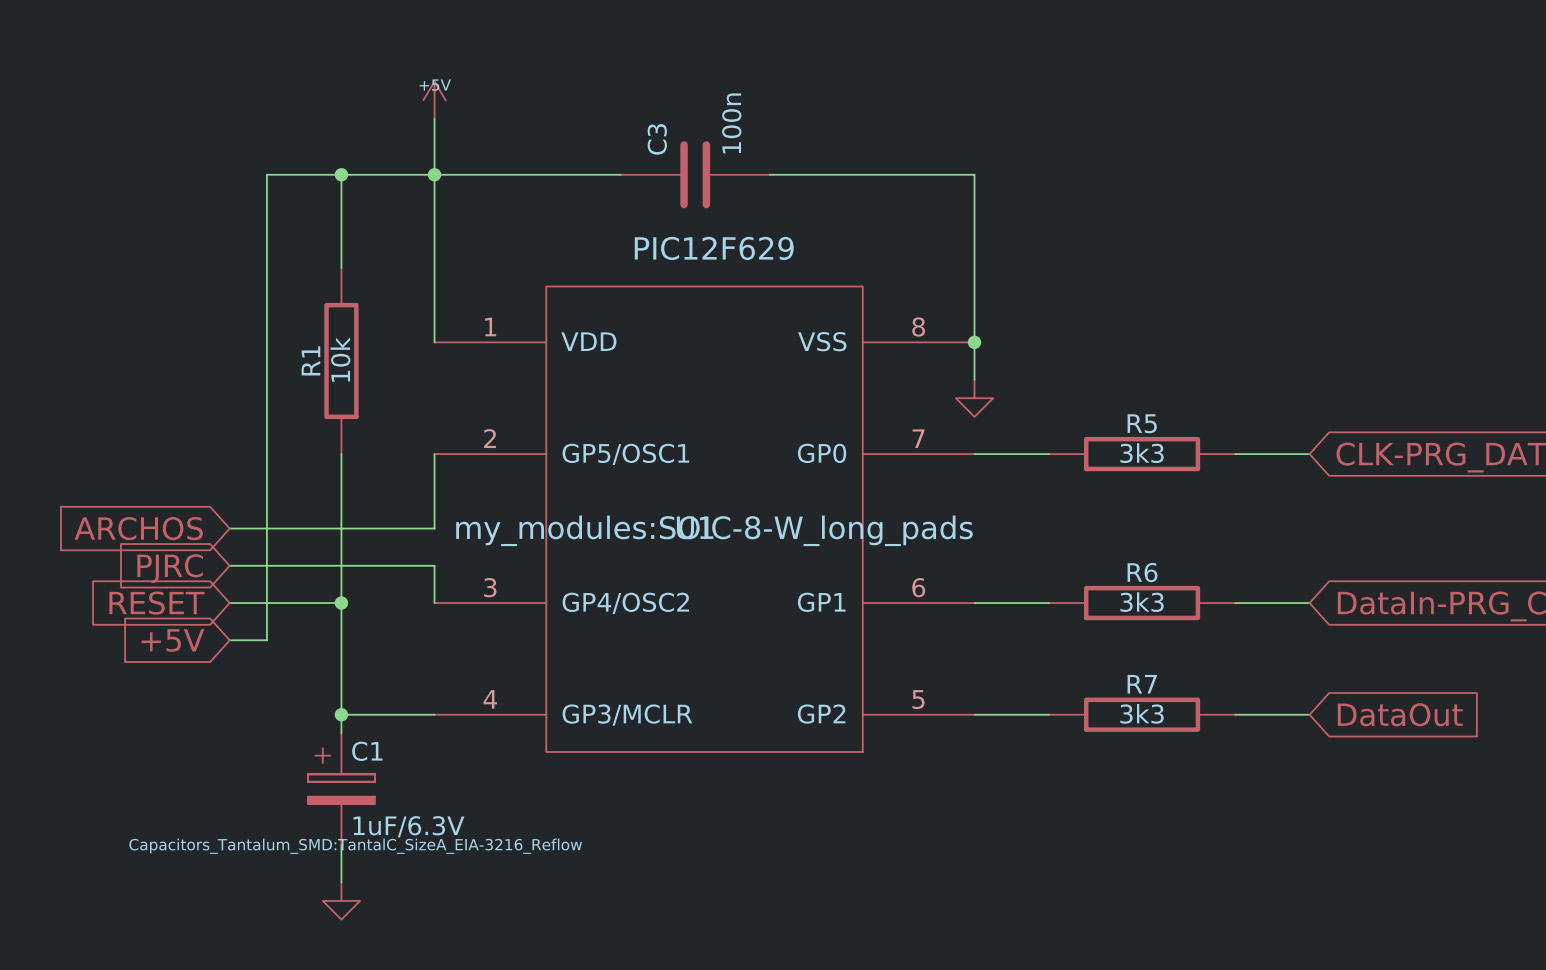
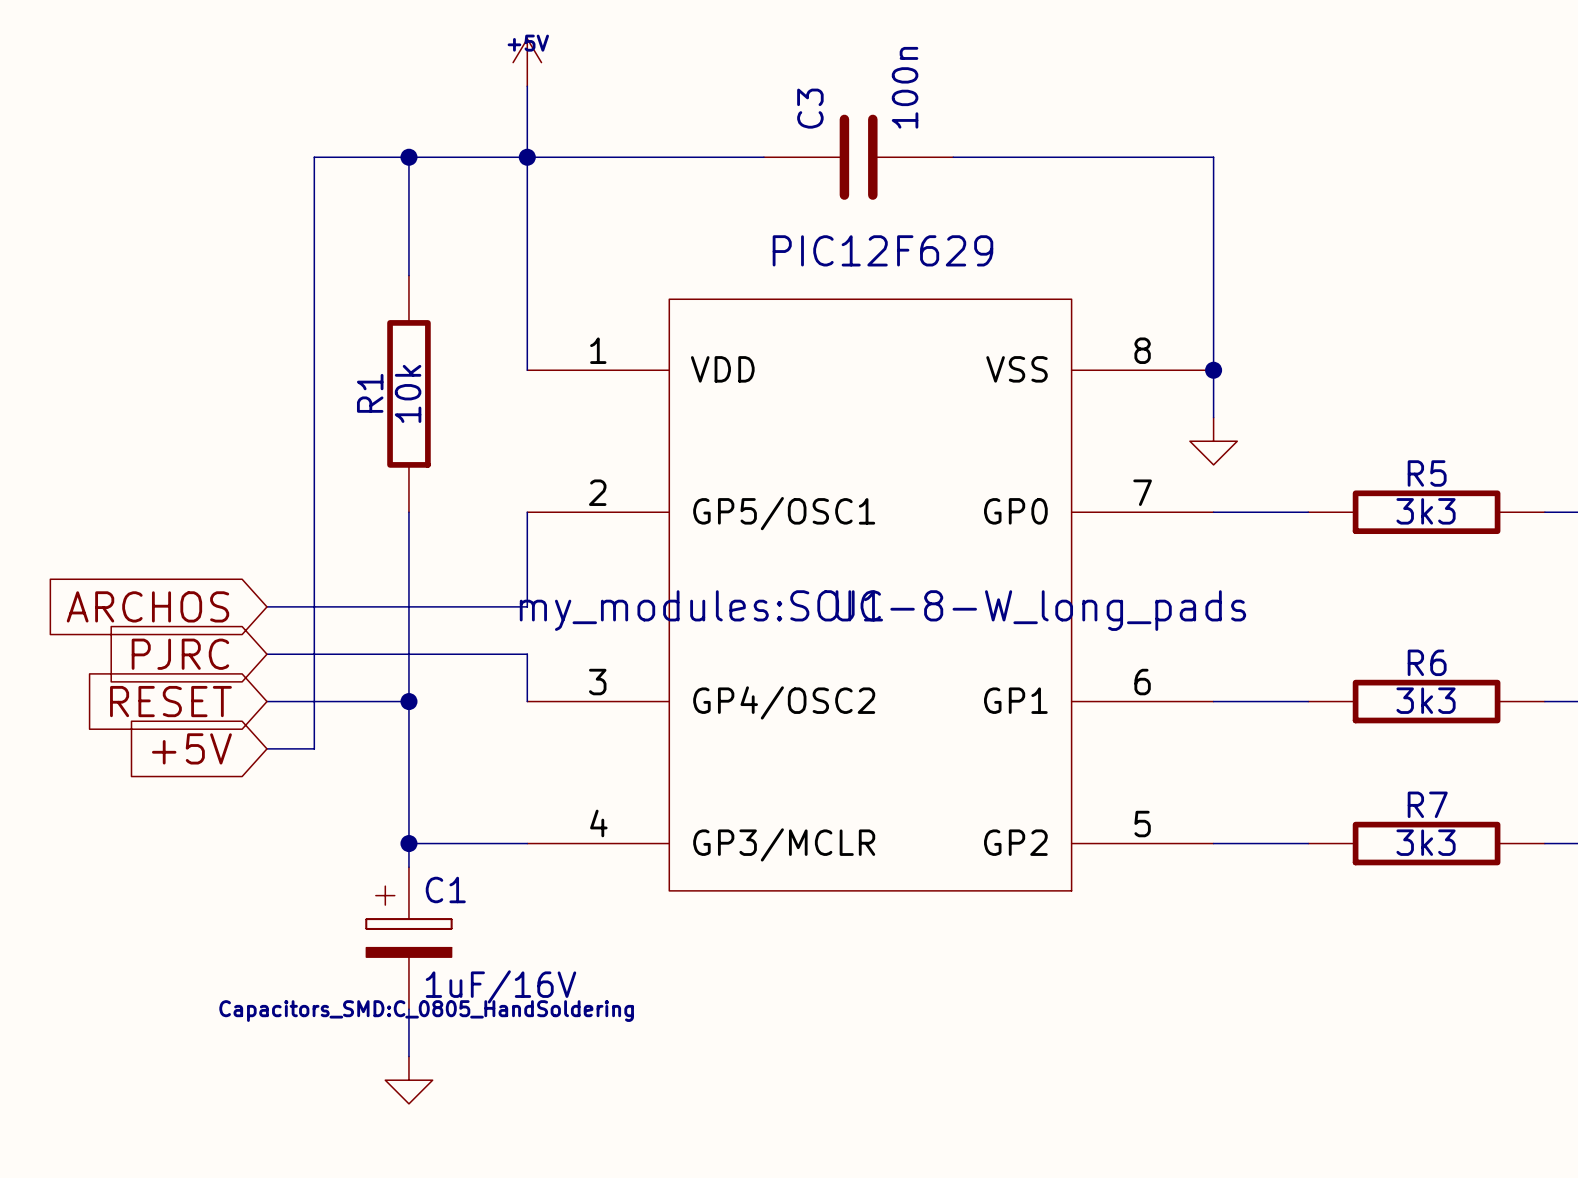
C1 value: 1uF/6.3V (408, 826) -> 1uF/16V (500, 986)
C1 text: Capacitors_Tantalum_SMD:TantalC_SizeA_EIA-3216_Reflow (355, 846) -> Capacitors_SMD:C_0805_HandSoldering (426, 1011)

